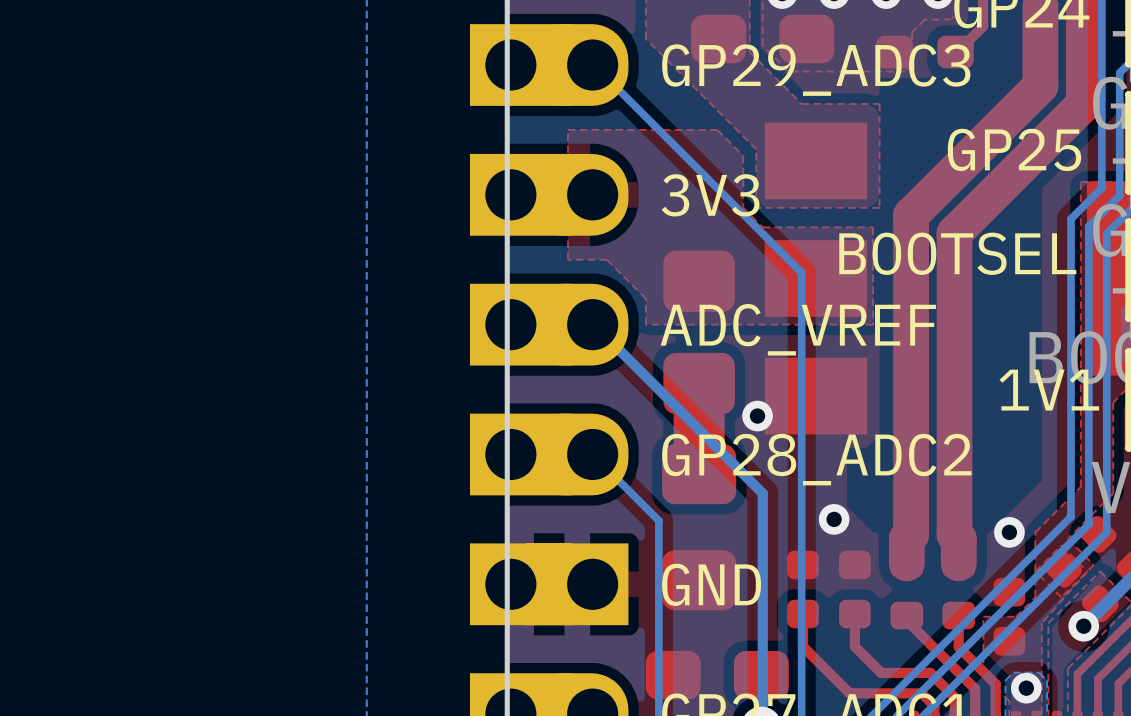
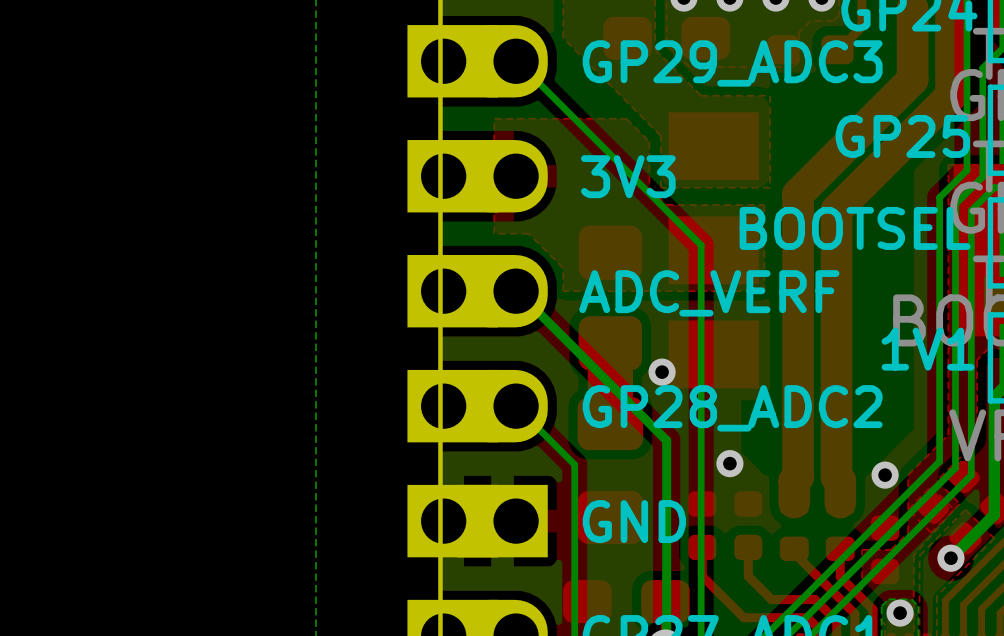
text: ADC_VREF (798, 329) -> ADC_VERF (709, 293)

